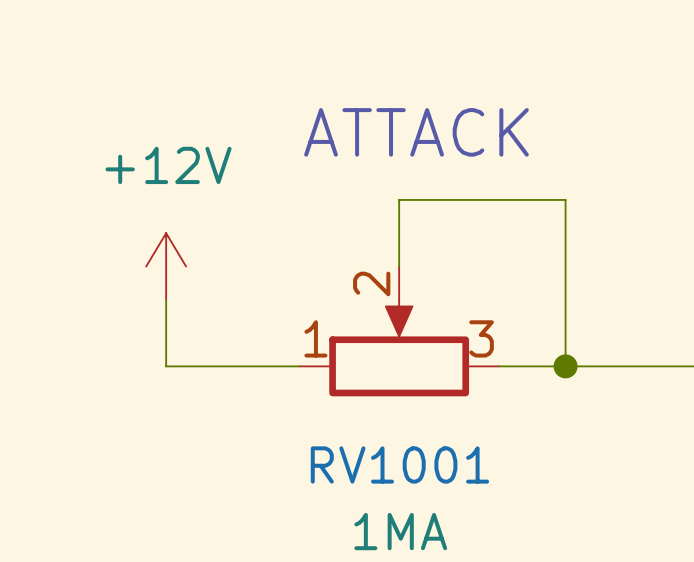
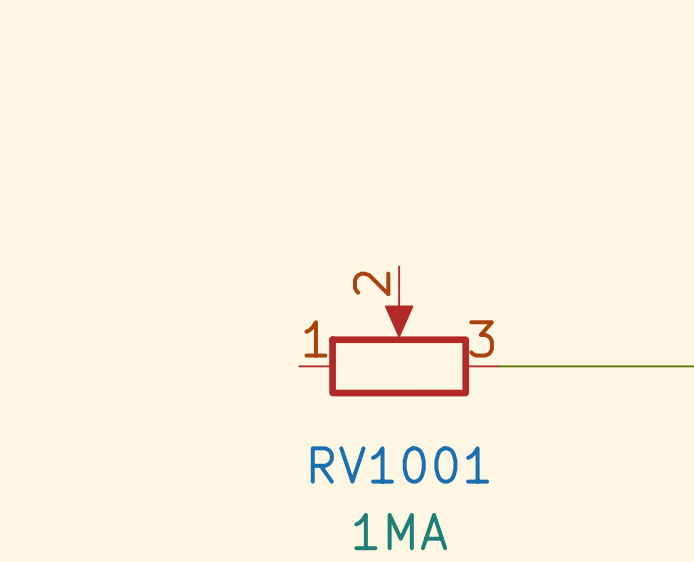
text: ATTACK (416, 132) -> none
power symbol: +12V (166, 266) -> none
wire: (399, 266) (399, 199) (565, 199) (565, 366) -> none
wire: (166, 299) (166, 366) (299, 366) -> none
junction: (565, 366) -> none

